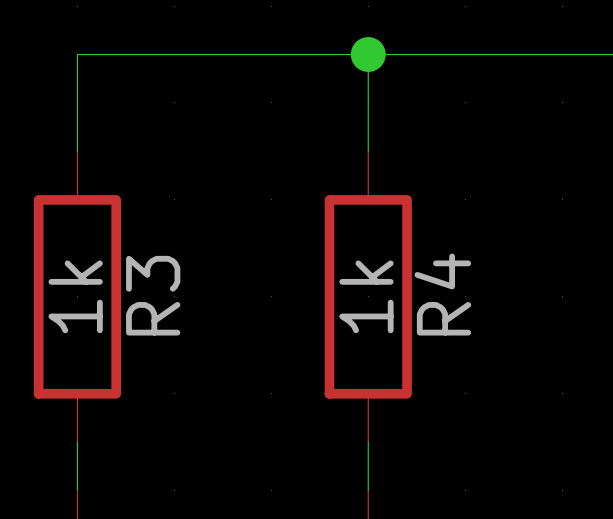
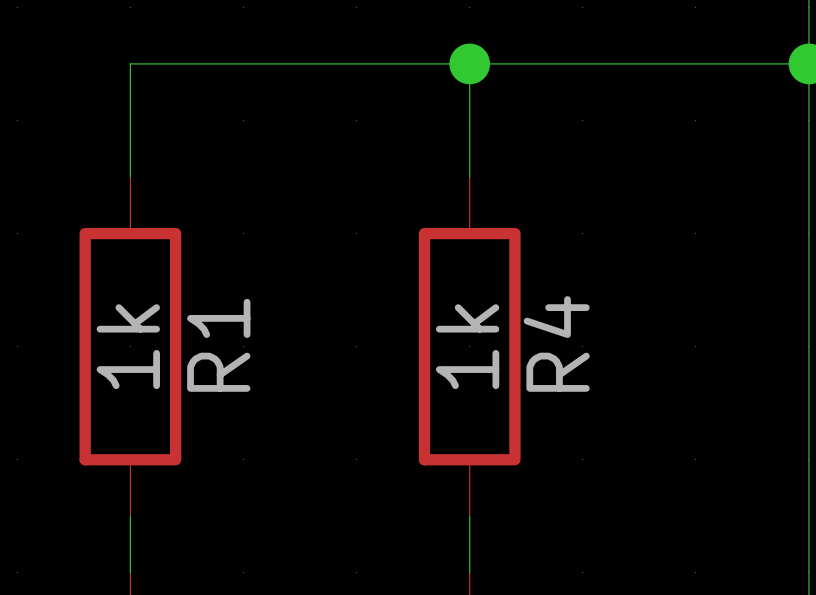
R3 name: R3 (153, 295) -> R1 (218, 345)

